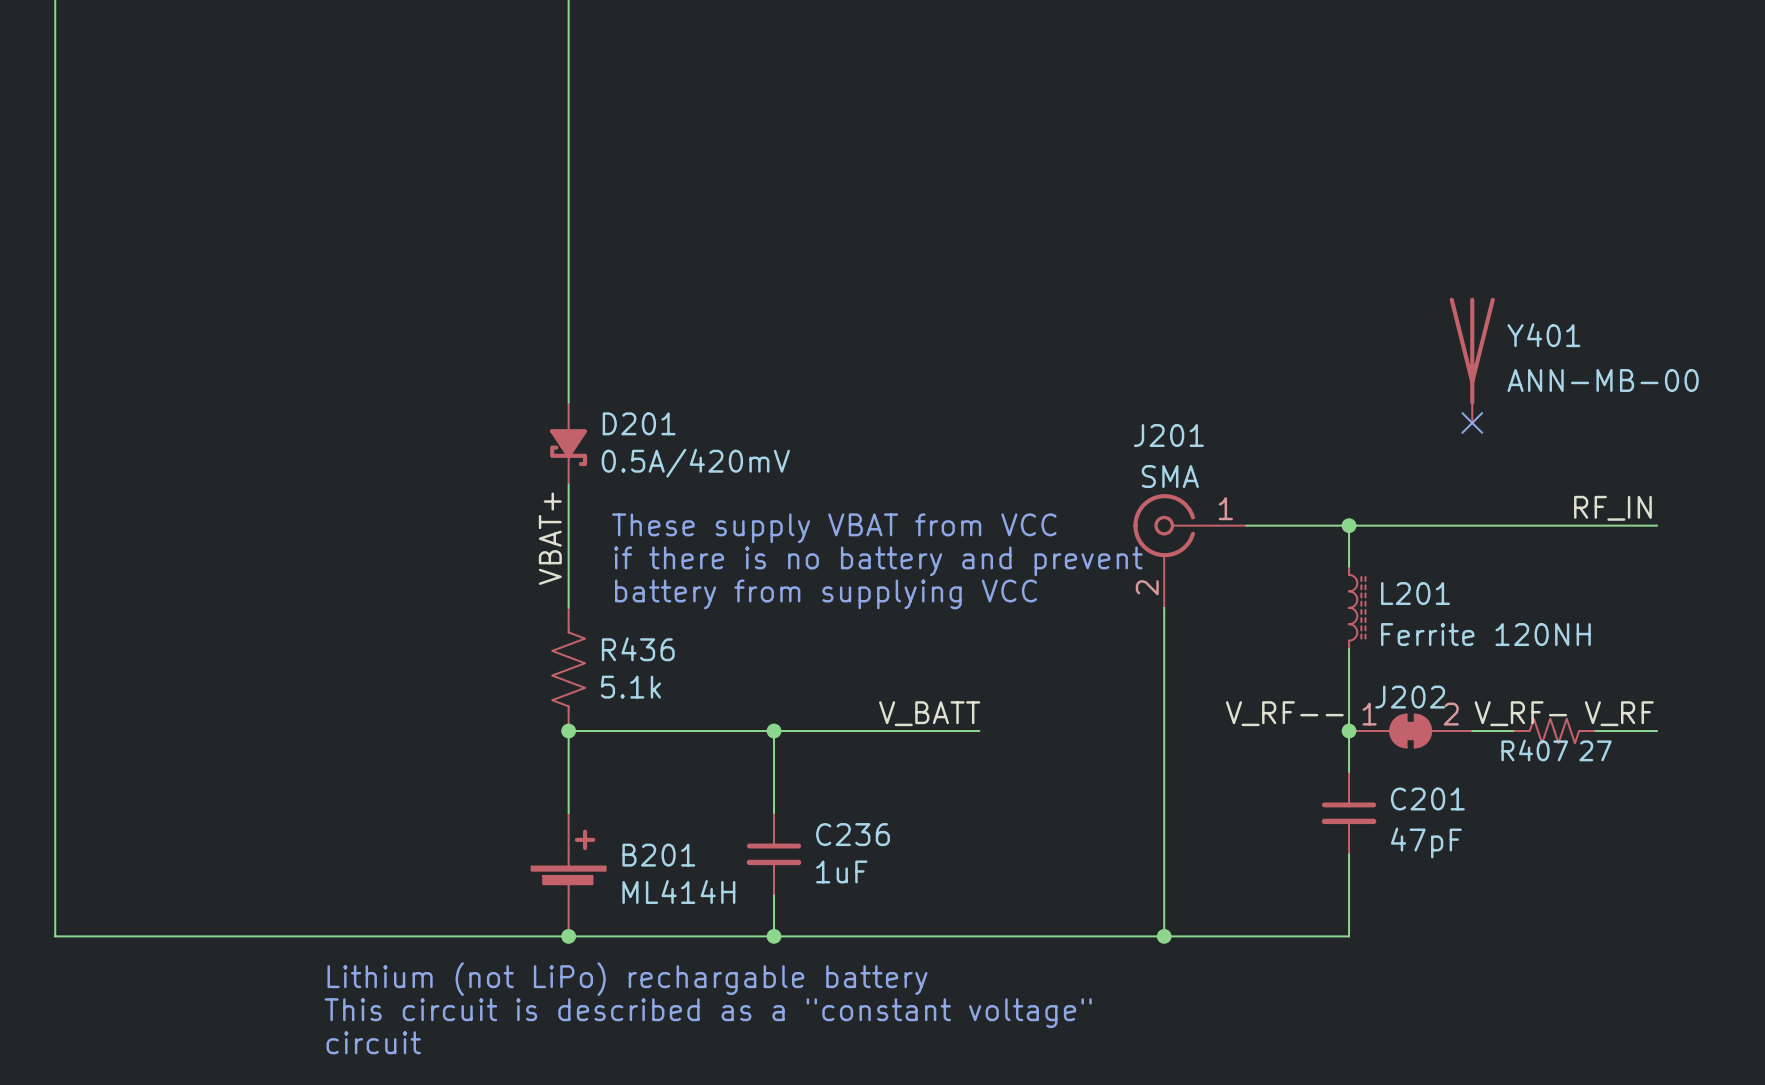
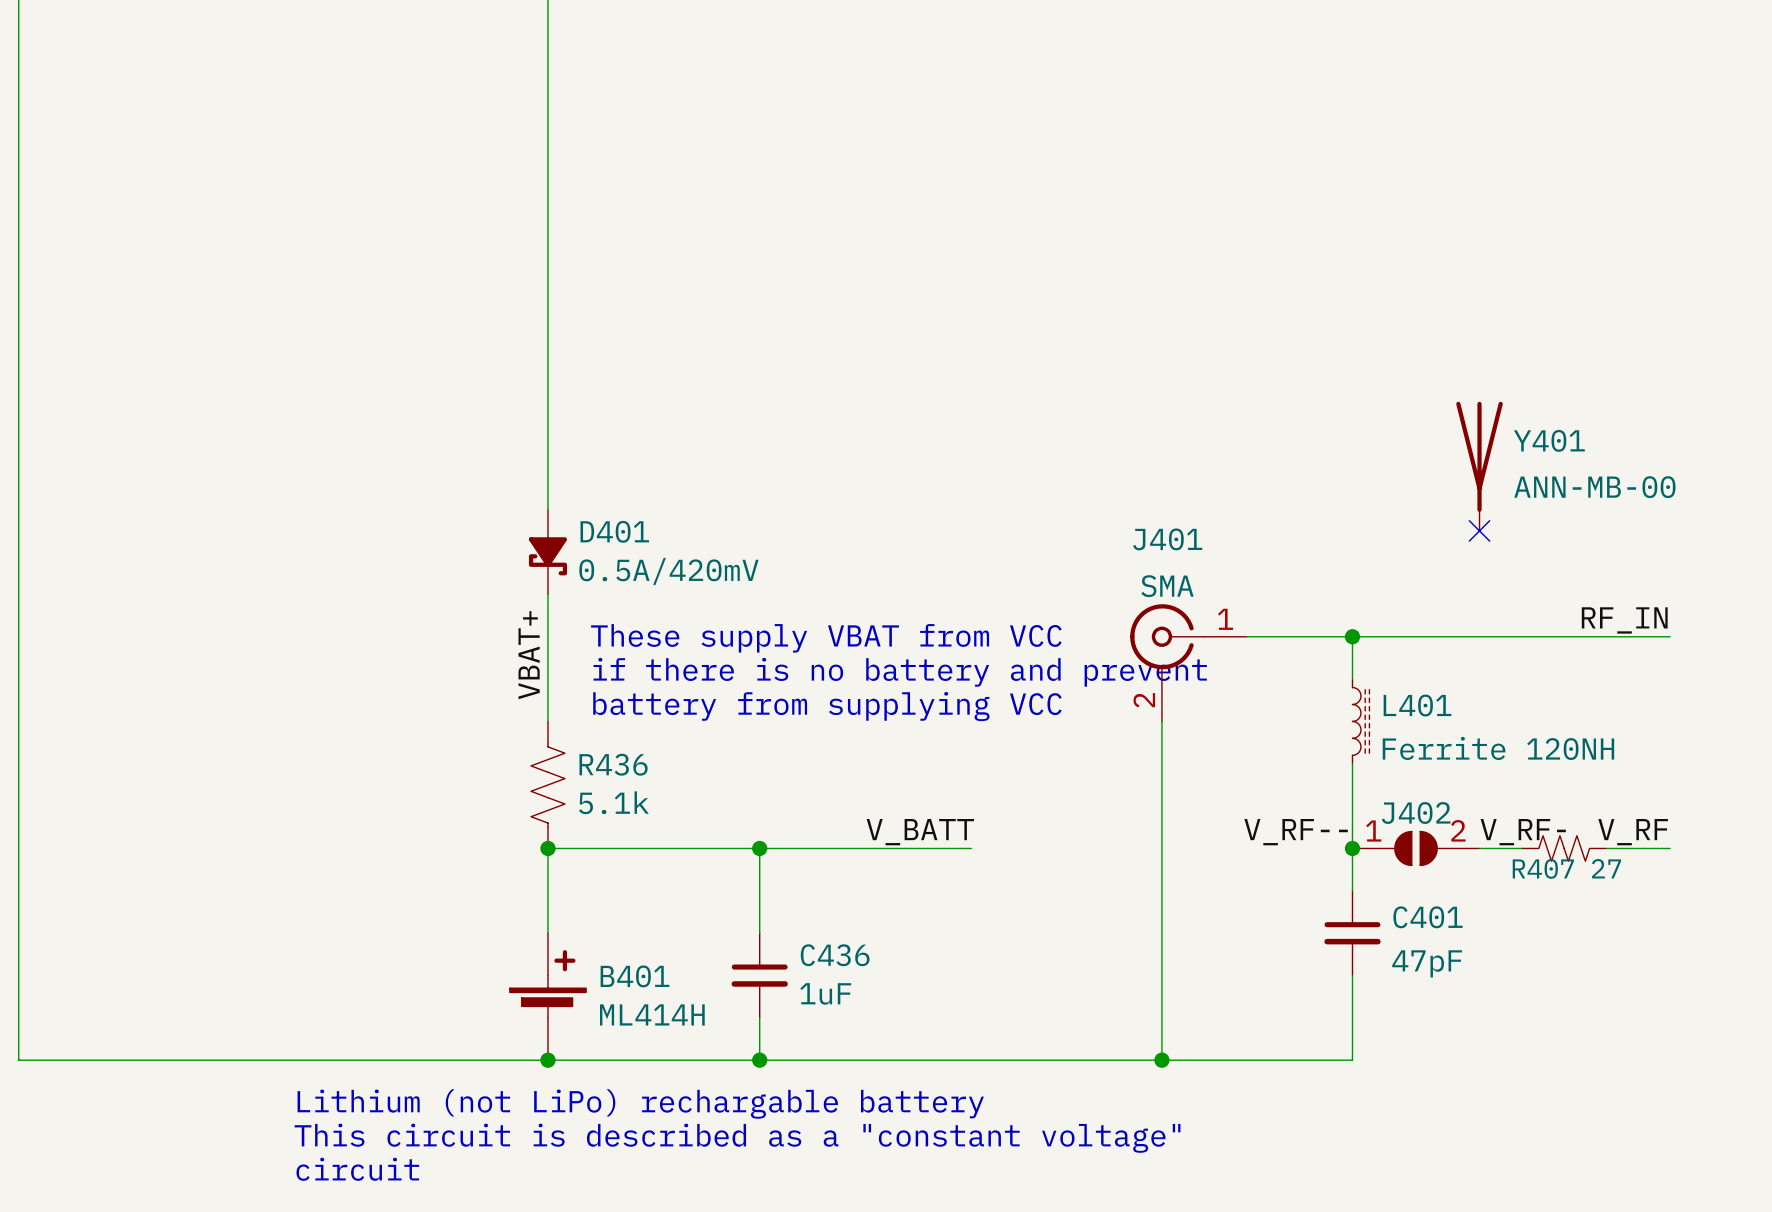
D201 name: D201 (639, 423) -> D401 (614, 531)
J201 name: J201 (1168, 435) -> J401 (1167, 539)
L201 name: L201 (1415, 593) -> L401 (1417, 705)
J202: (1410, 731) -> none
J402: none -> (1416, 848)
C201 name: C201 (1427, 799) -> C401 (1427, 917)
C236 name: C236 (853, 834) -> C436 (835, 955)
B201 name: B201 (658, 855) -> B401 (634, 976)

